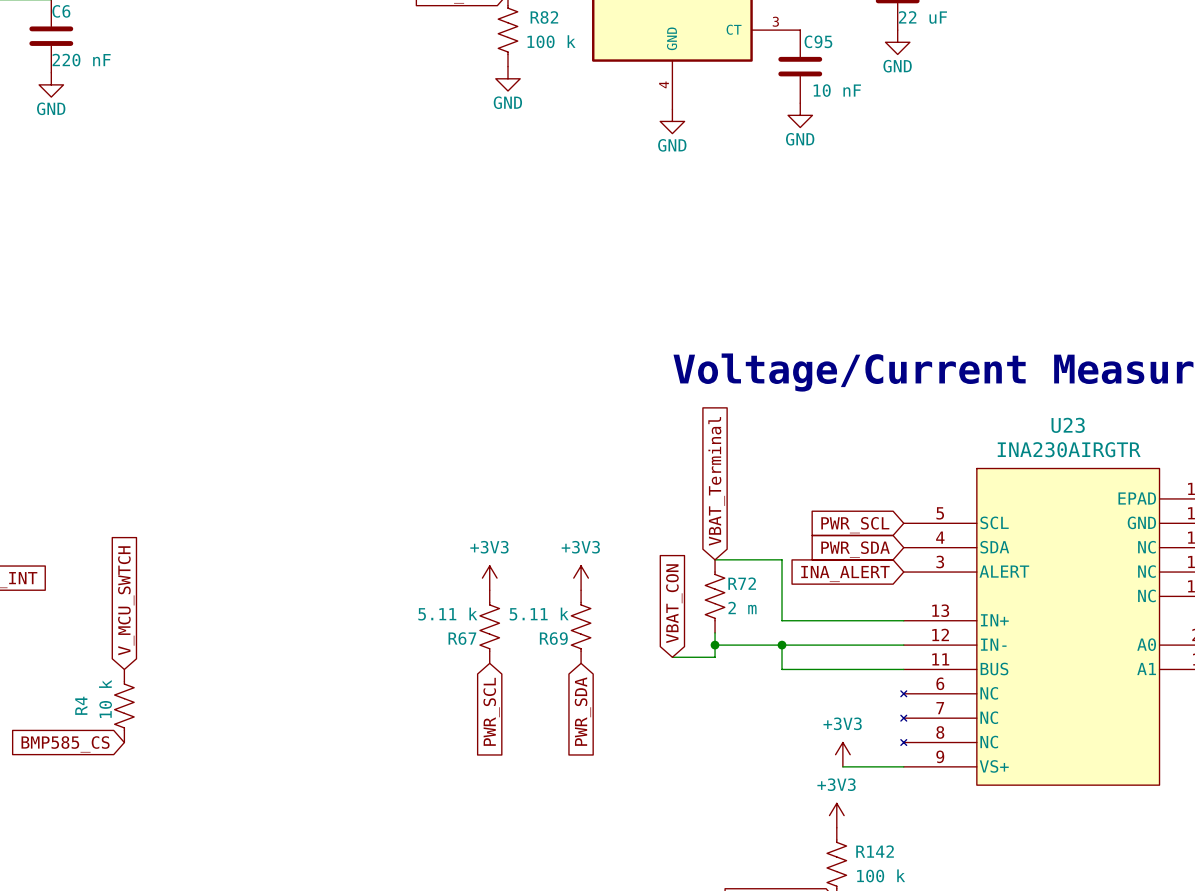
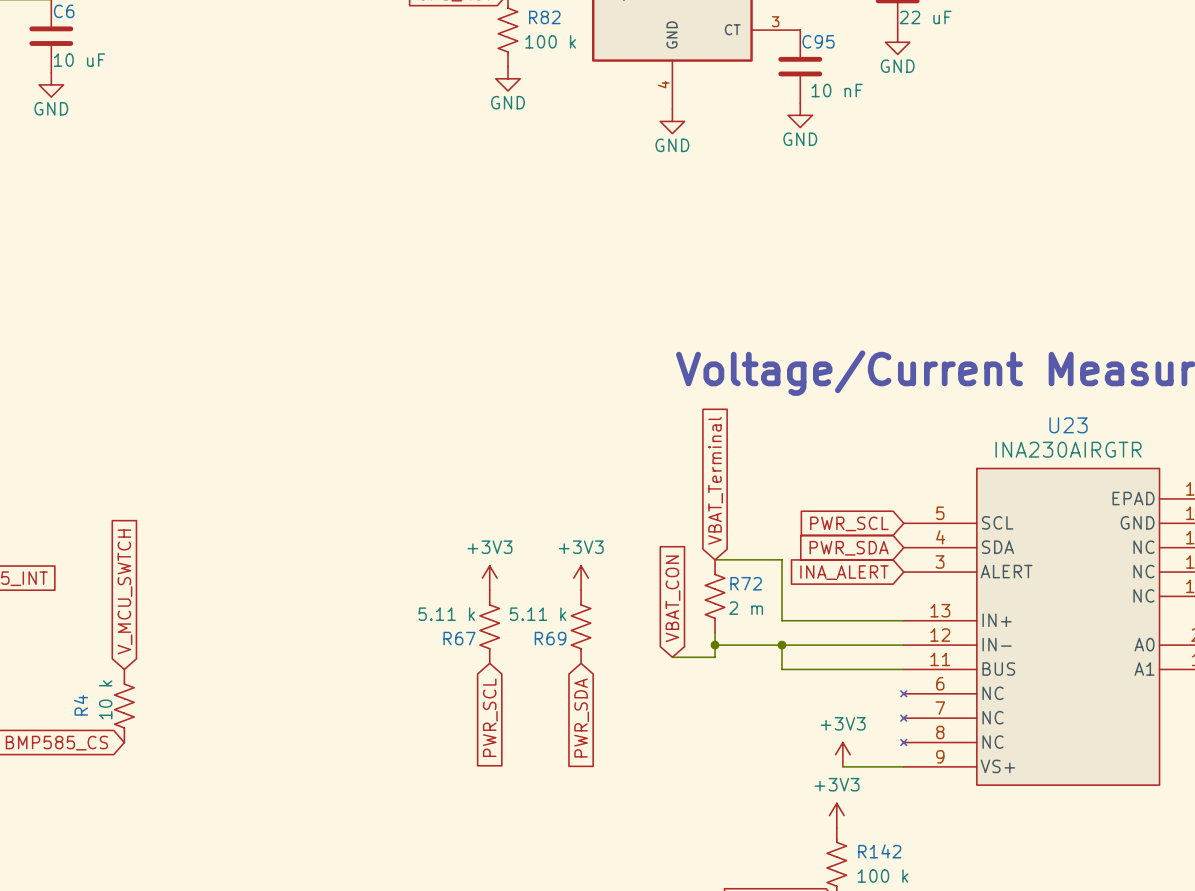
C6 value: 220 nF (81, 60) -> 10 uF (79, 60)

